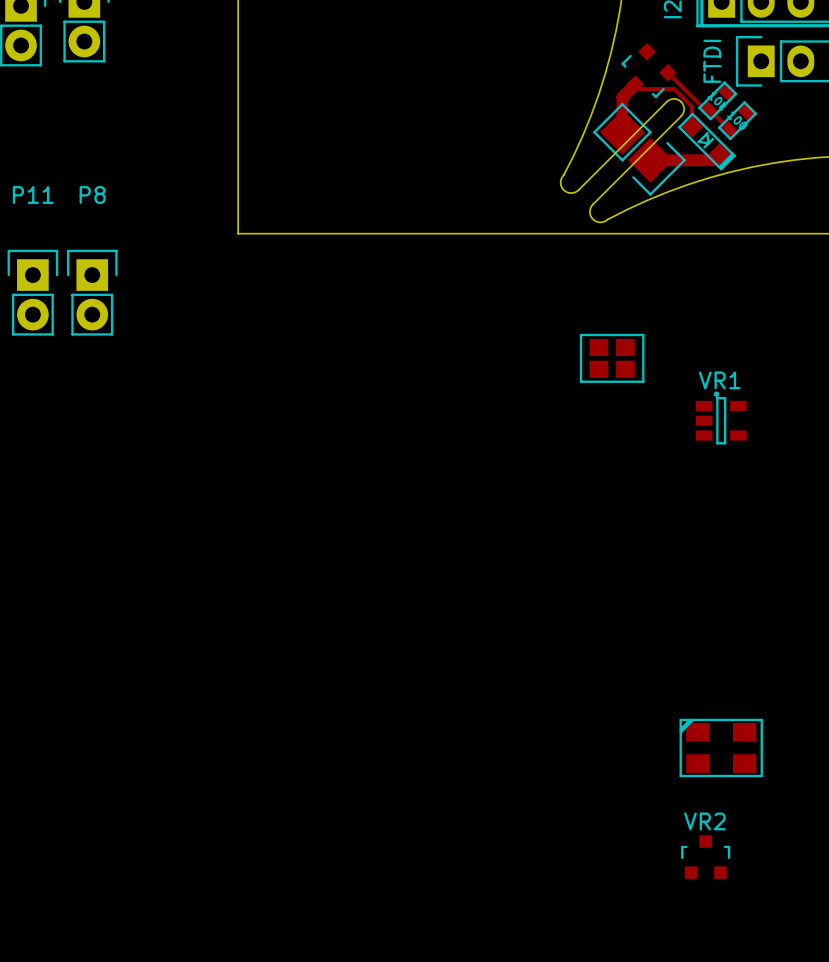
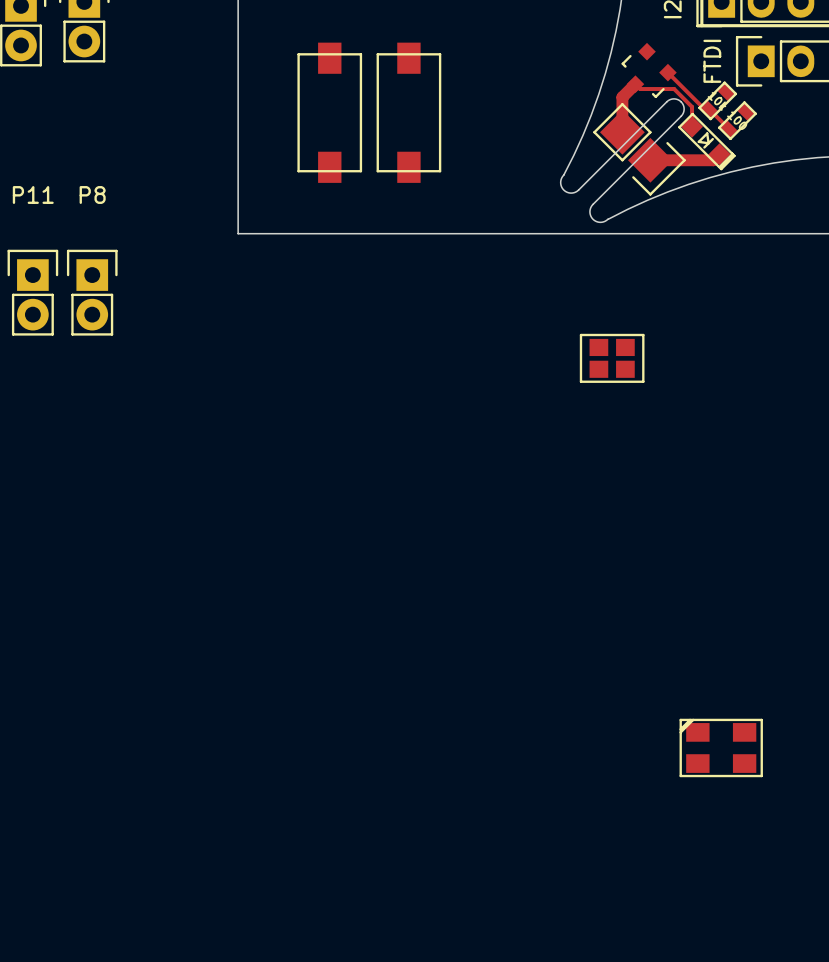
part: none -> (329, 112)
part: none -> (408, 112)
VR1: (721, 417) -> none
VR2: (705, 857) -> none

